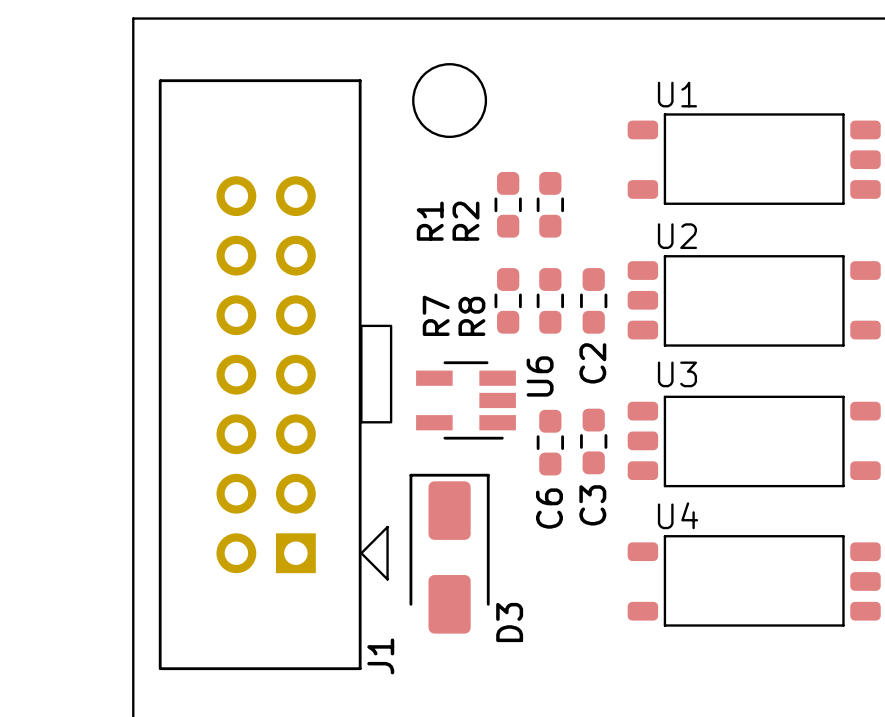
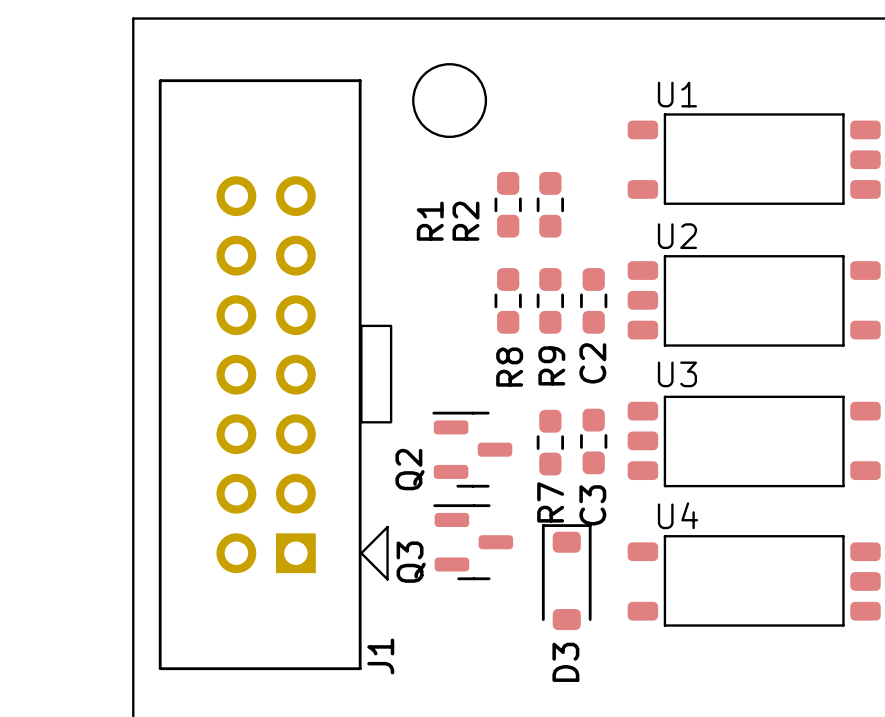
R7 name: R7 (436, 315) -> R8 (509, 367)
R8 name: R8 (471, 316) -> R9 (551, 365)
U6: (466, 400) -> none
Q2: none -> (472, 449)
D3 footprint: [409, 473, 490, 634] -> [541, 524, 592, 631]
C6 name: C6 (549, 508) -> R7 (550, 502)
Q3: none -> (473, 542)
D3 name position: D3 (509, 622) -> D3 (565, 662)

